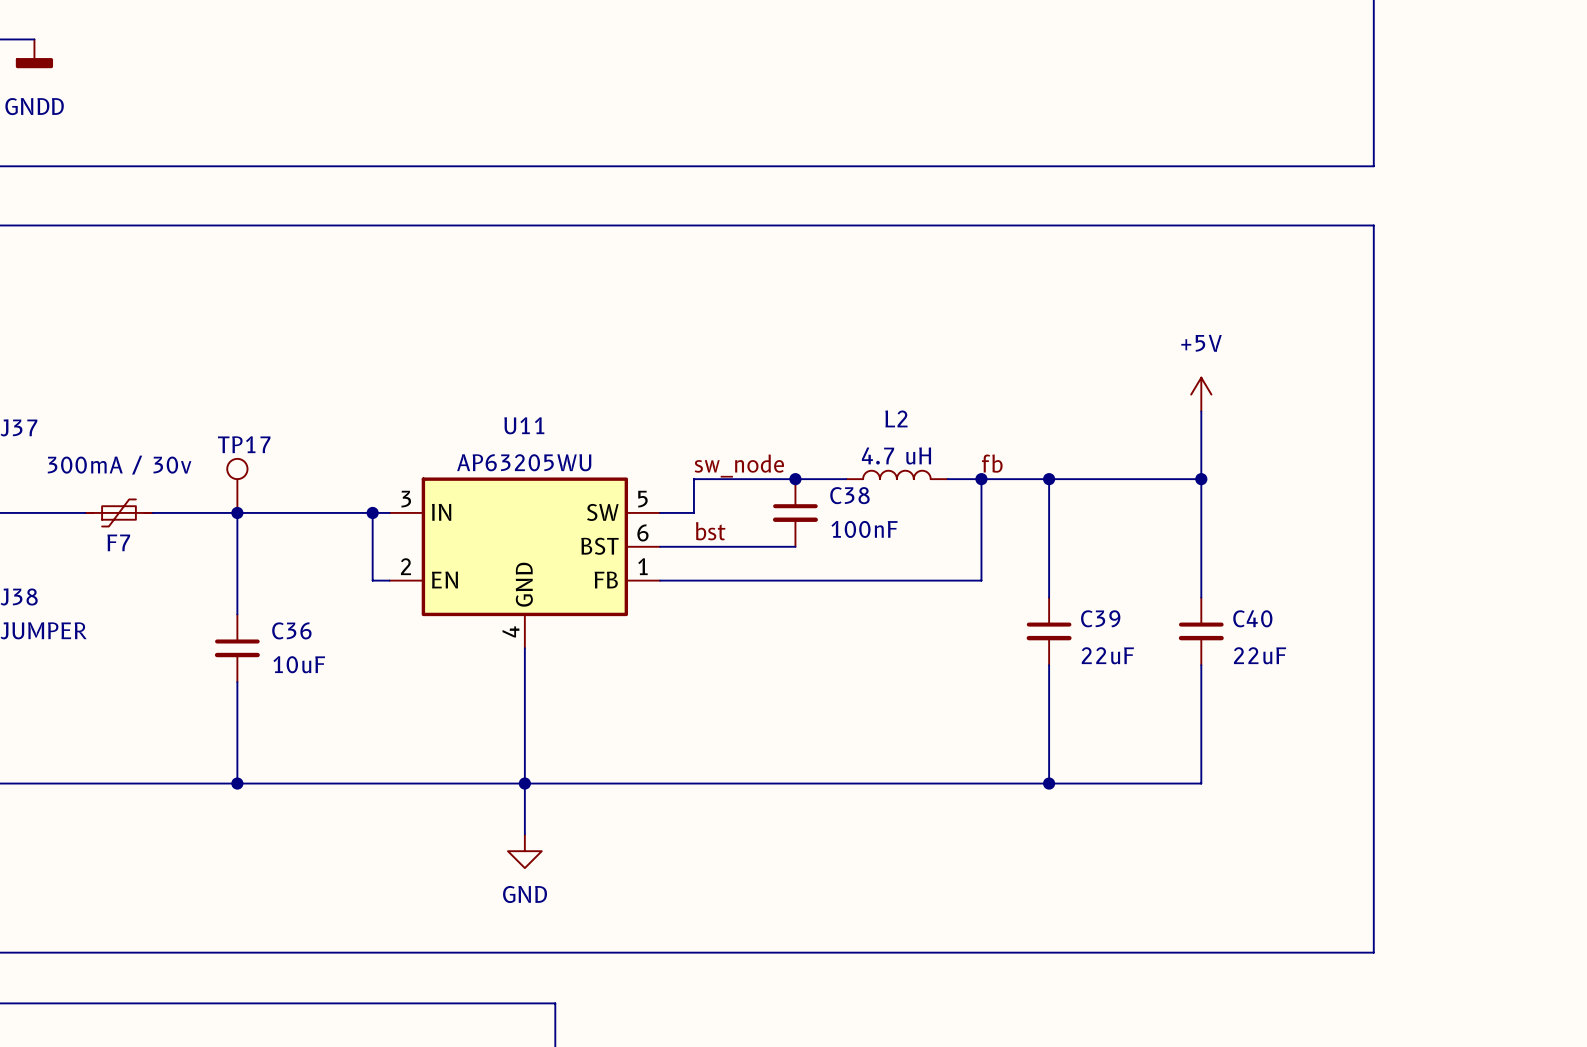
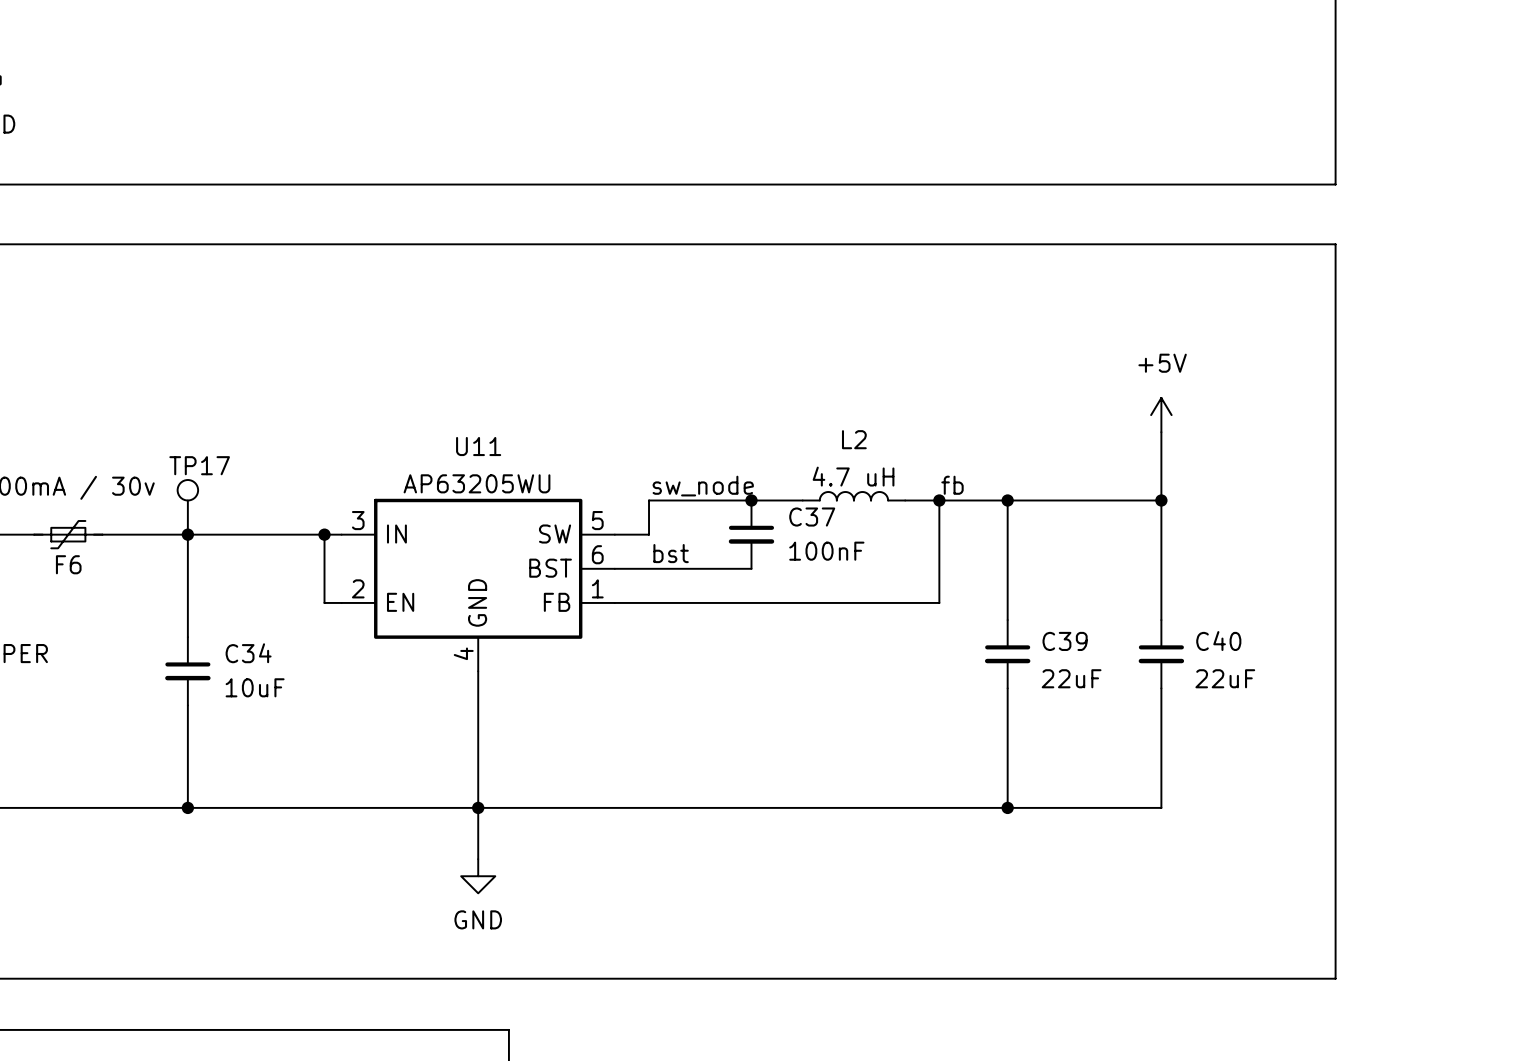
C38 name: C38 (849, 495) -> C37 (812, 517)
F7 name: F7 (118, 542) -> F6 (68, 564)
C36 name: C36 (291, 630) -> C34 (248, 653)

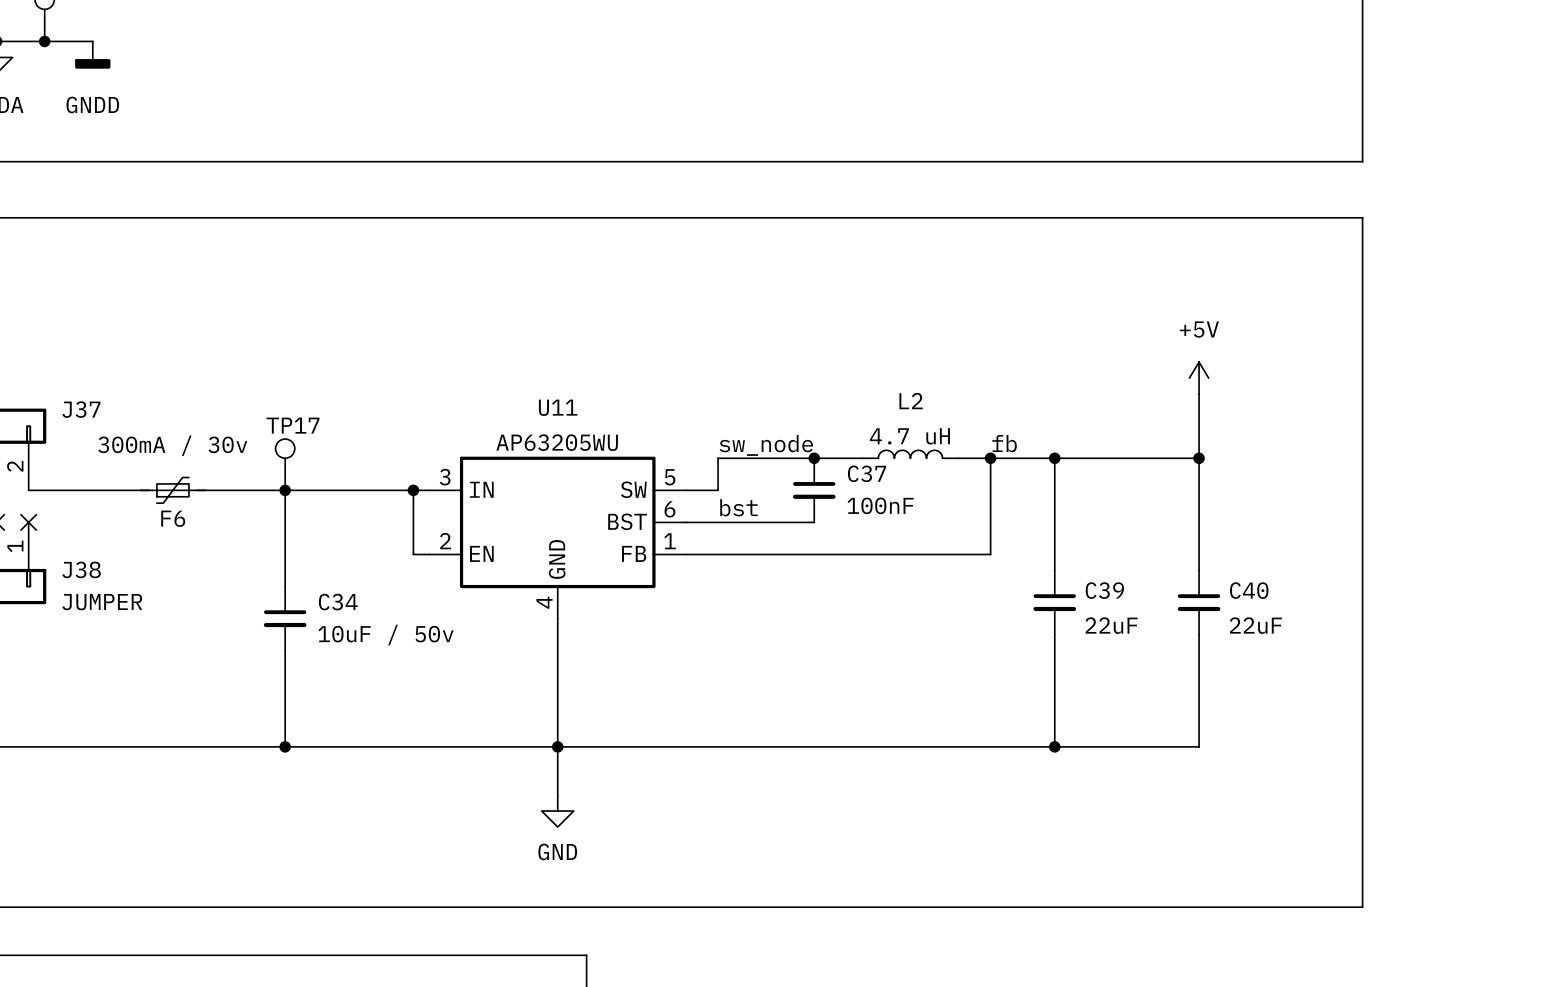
C34 value: 10uF (255, 687) -> 10uF / 50v (386, 635)

